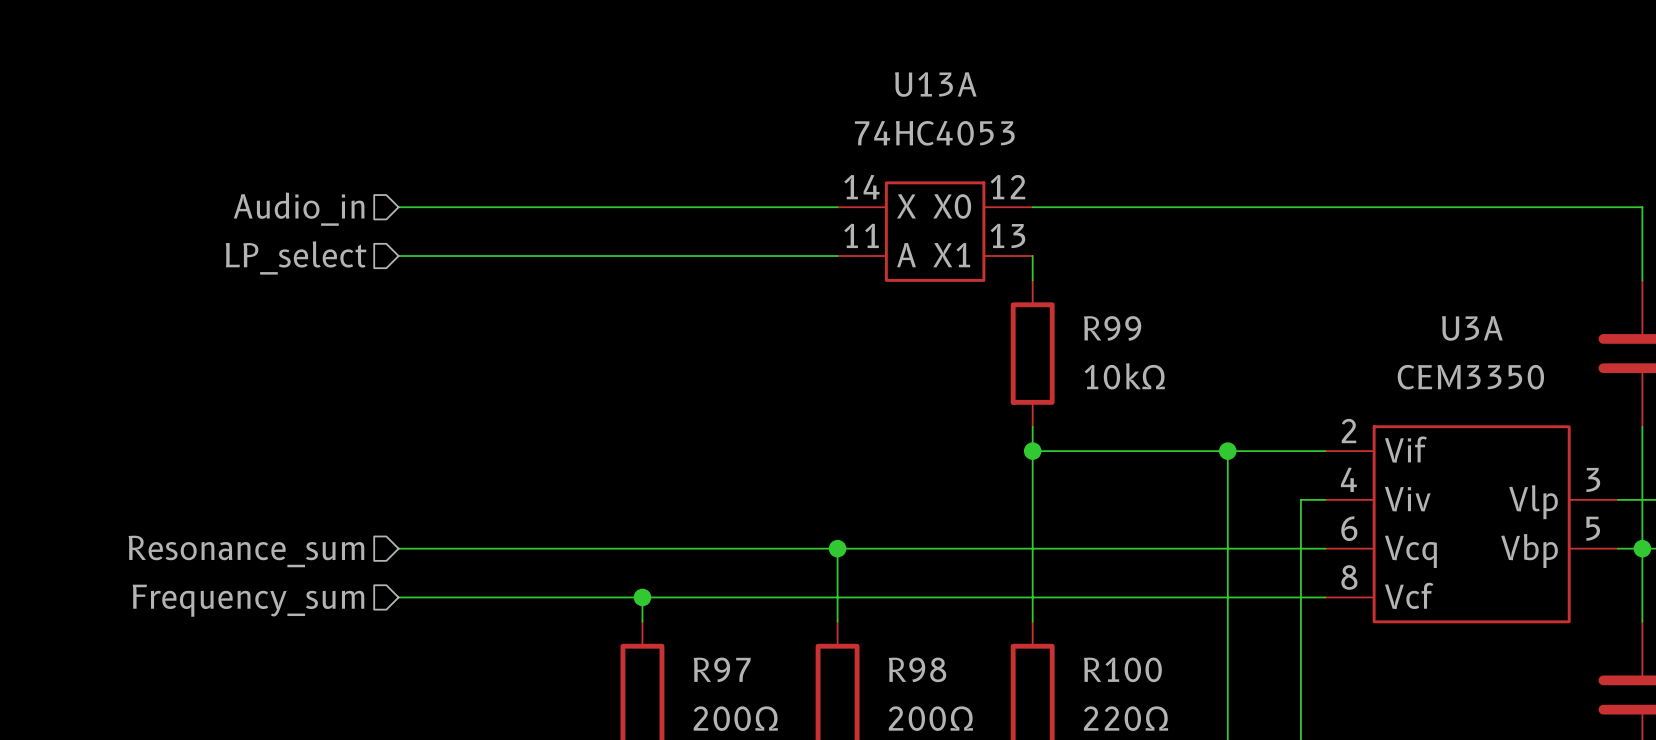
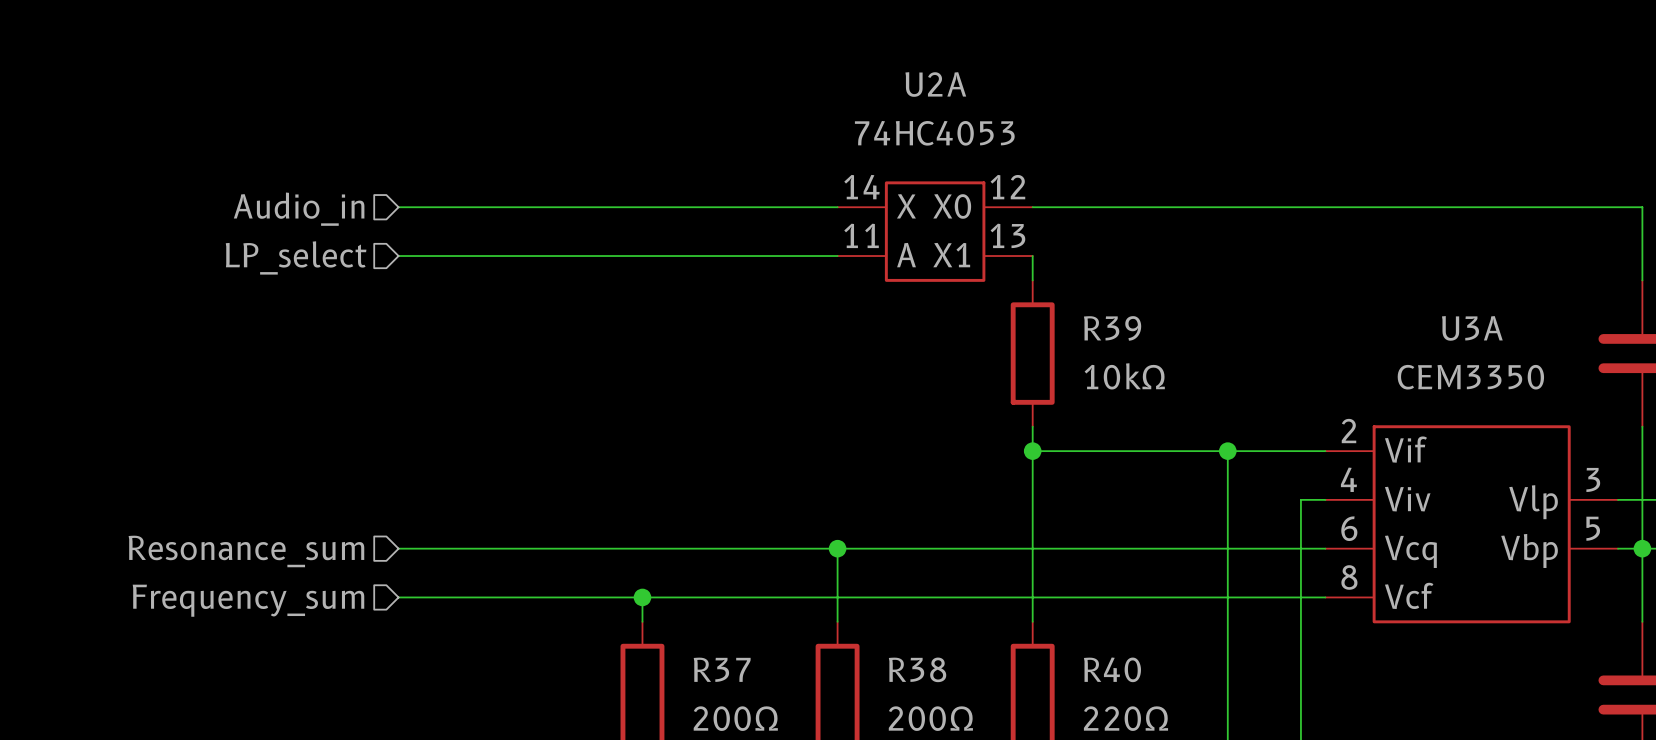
U13A name: U13A (935, 84) -> U2A (935, 84)
R99 name: R99 (1112, 328) -> R39 (1112, 328)
R97 name: R97 (722, 669) -> R37 (722, 669)
R98 name: R98 (917, 669) -> R38 (917, 669)
R100 name: R100 (1122, 669) -> R40 (1112, 669)

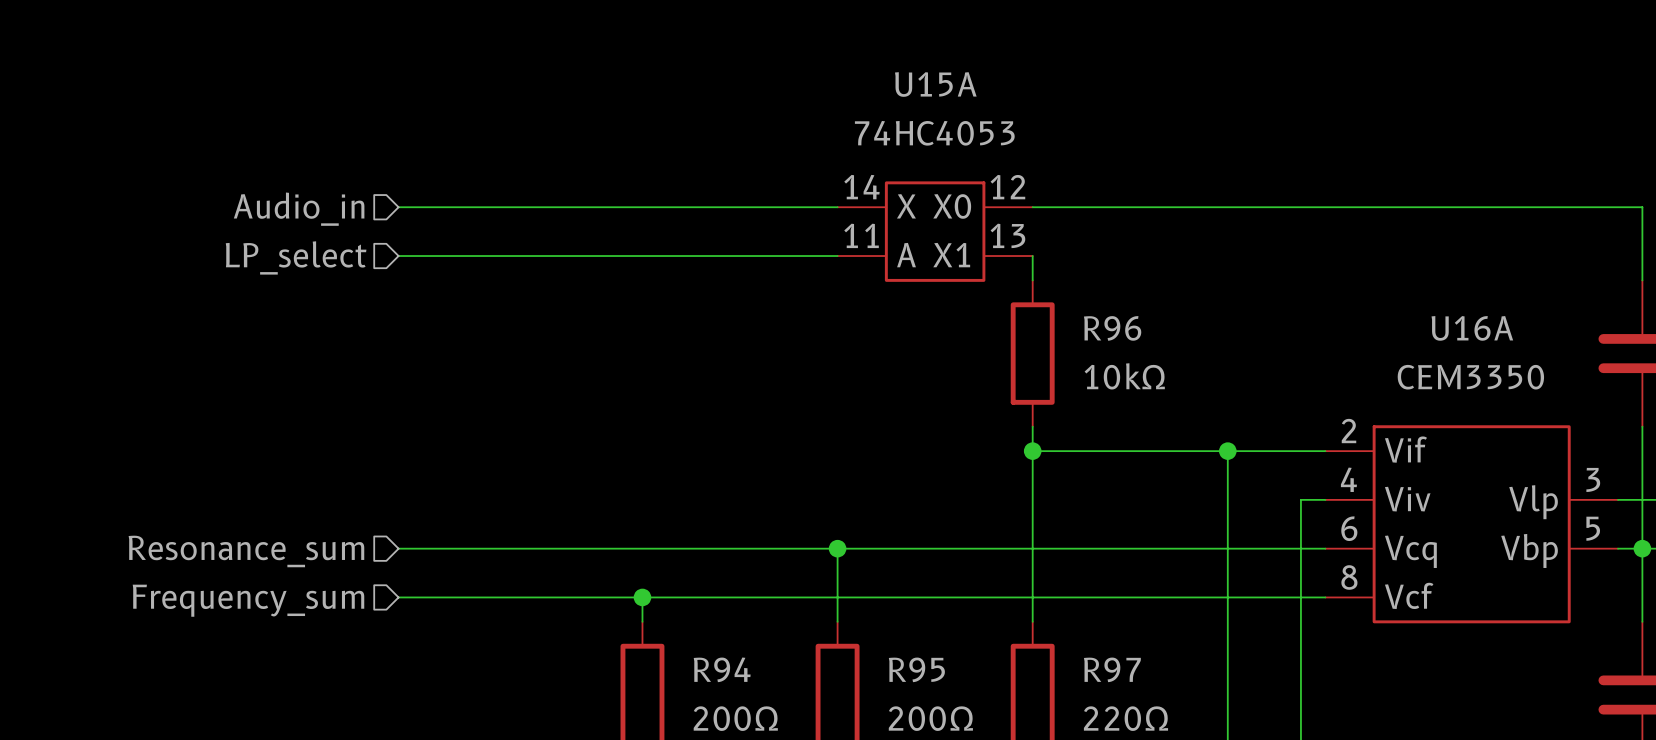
U2A name: U2A (935, 84) -> U15A (935, 84)
R39 name: R39 (1112, 328) -> R96 (1112, 328)
U3A name: U3A (1472, 328) -> U16A (1472, 328)
R37 name: R37 (722, 669) -> R94 (722, 669)
R38 name: R38 (917, 669) -> R95 (916, 669)
R40 name: R40 (1112, 669) -> R97 (1112, 669)

